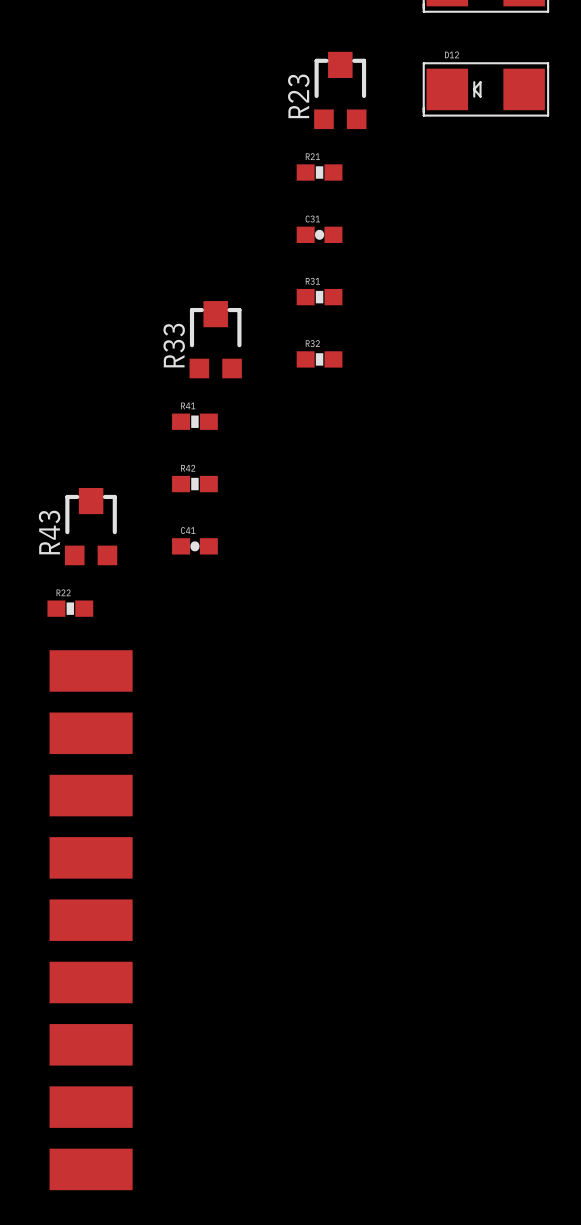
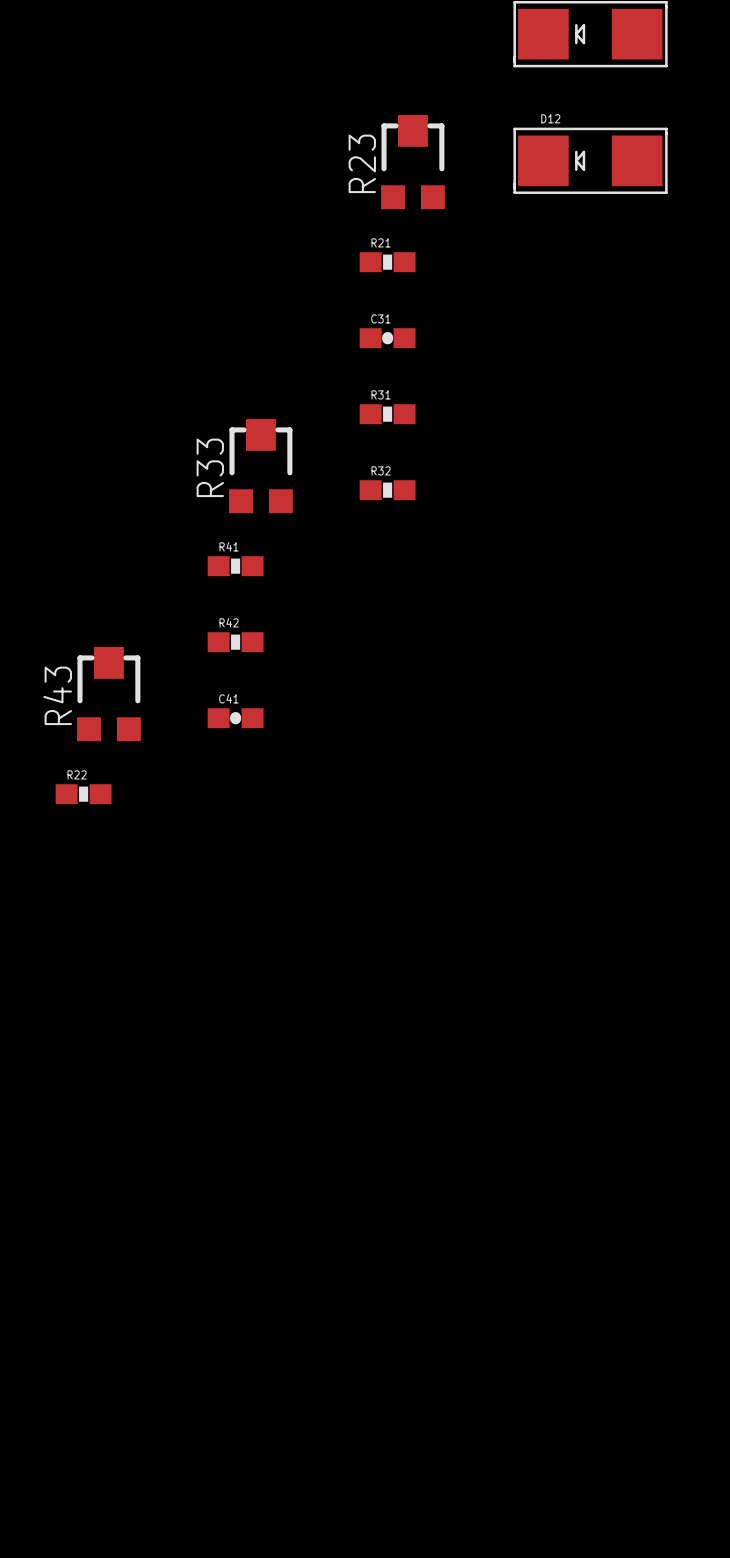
part: (91, 670) -> none
part: (91, 733) -> none
part: (91, 795) -> none
part: (91, 857) -> none
part: (91, 920) -> none
part: (91, 982) -> none
part: (91, 1044) -> none
part: (91, 1107) -> none
part: (91, 1169) -> none

